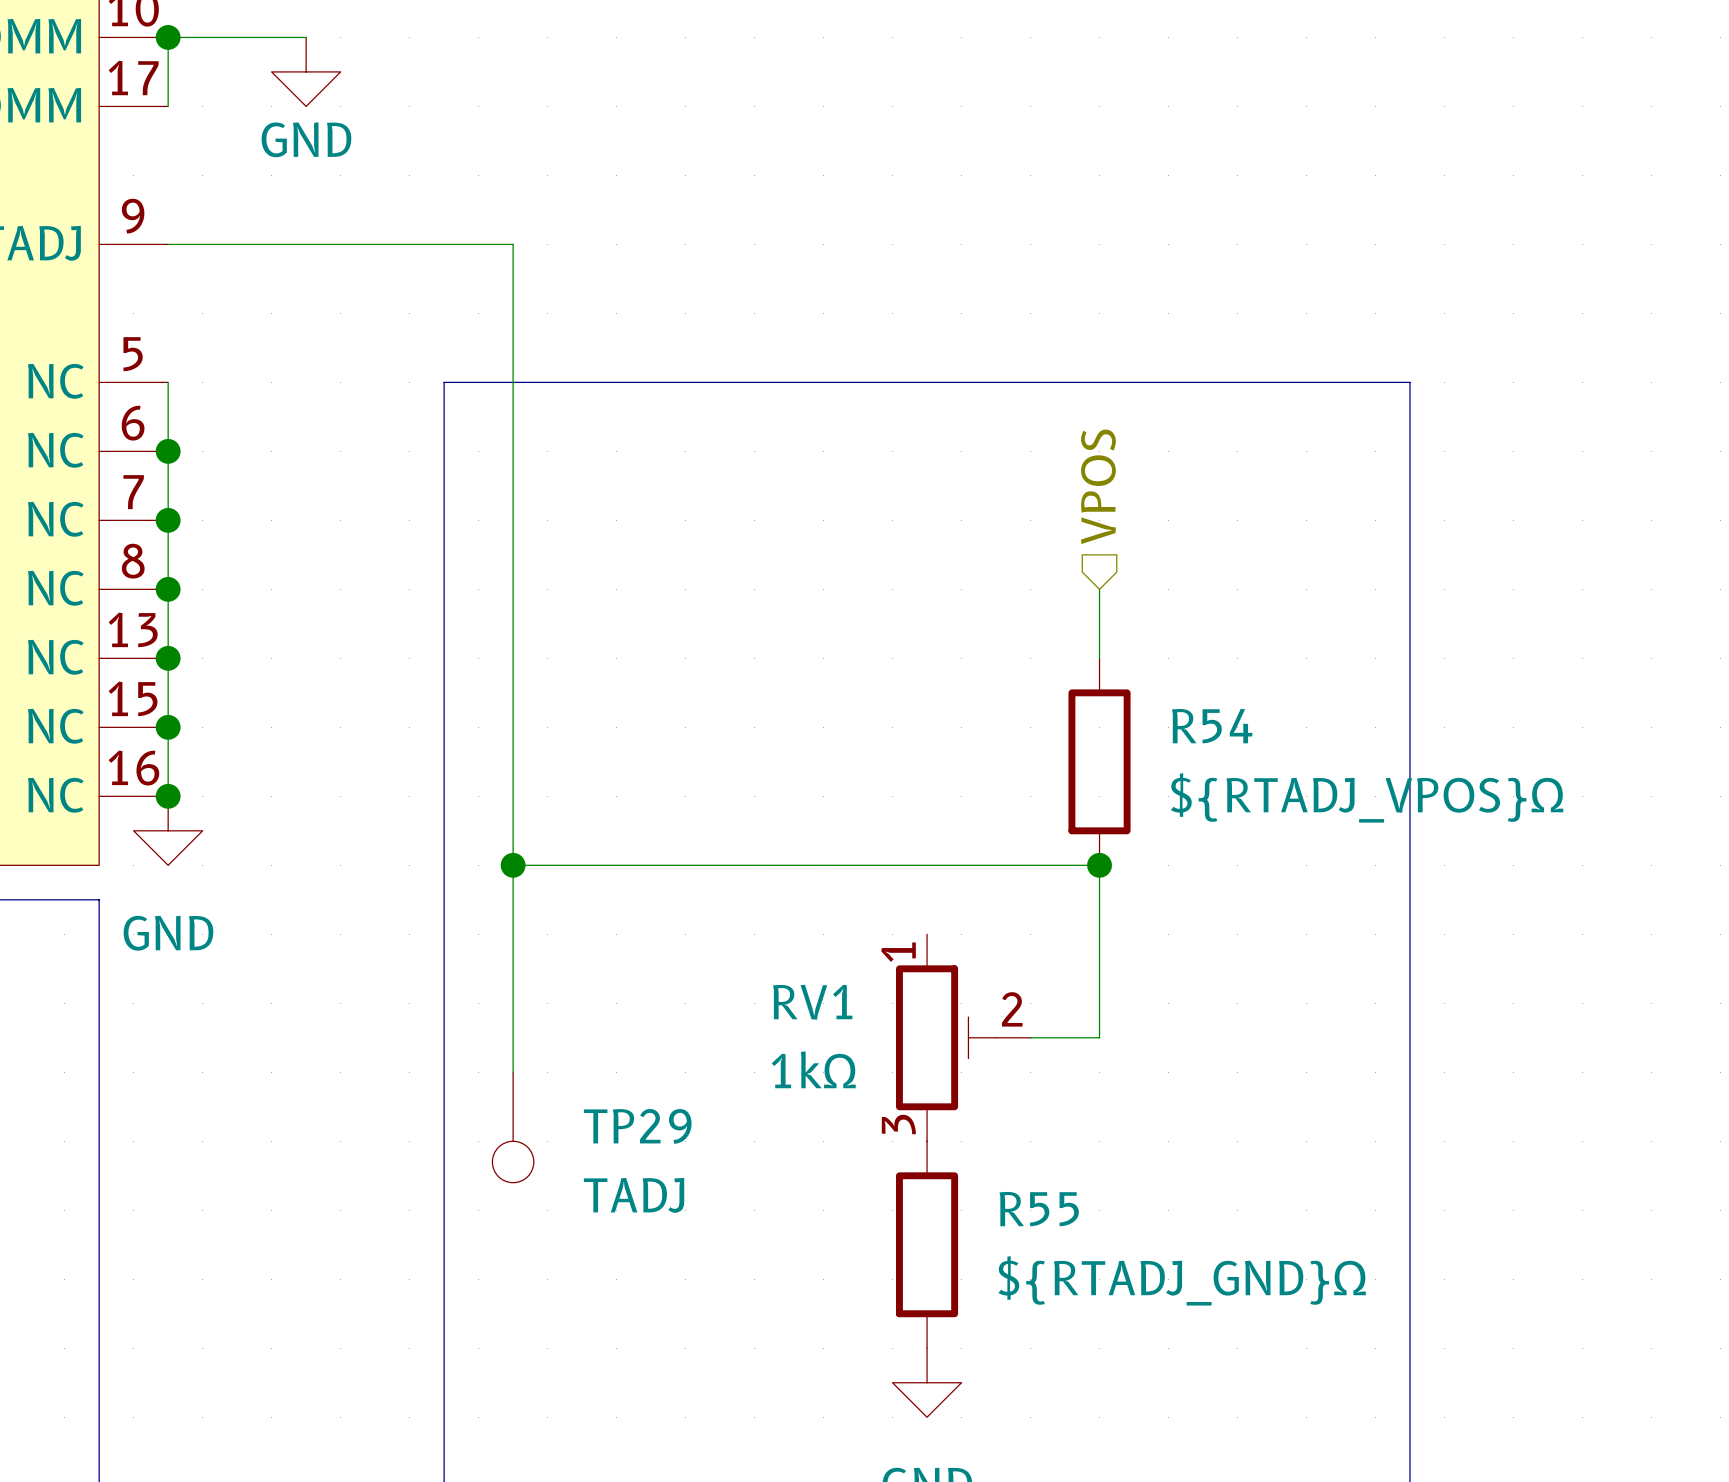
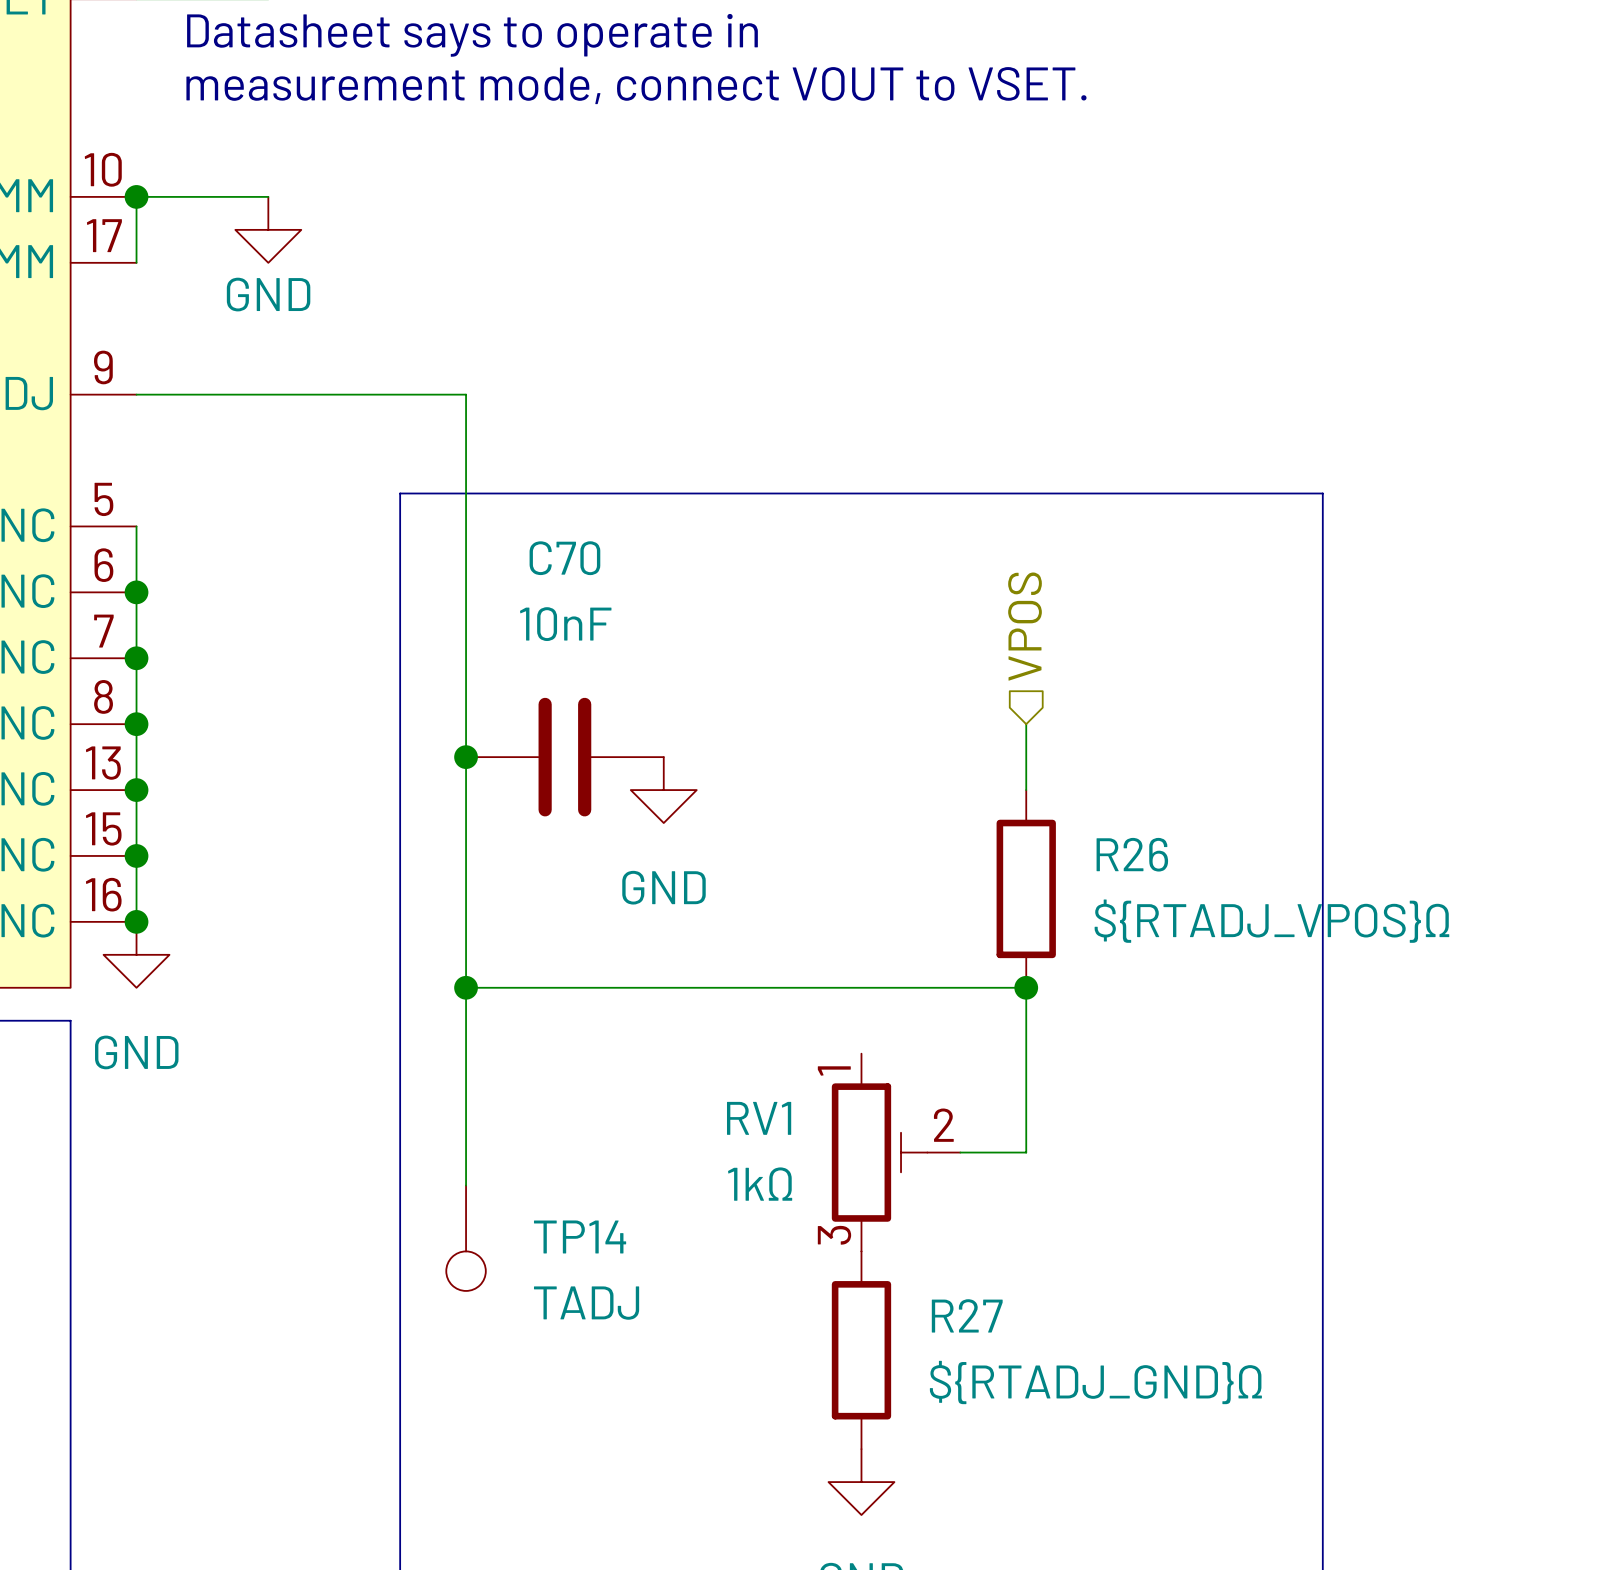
line: (444, 382) (1409, 382) -> (400, 526) (400, 493) (1322, 493) (1322, 526)
junction: none -> (466, 757)
C70: none -> 10nF (564, 757)
power symbol: none -> GND (663, 790)
R54 name: R54 (1212, 726) -> R26 (1132, 854)
TP29 name: TP29 (637, 1126) -> TP14 (580, 1236)
R55 name: R55 (1039, 1209) -> R27 (967, 1315)

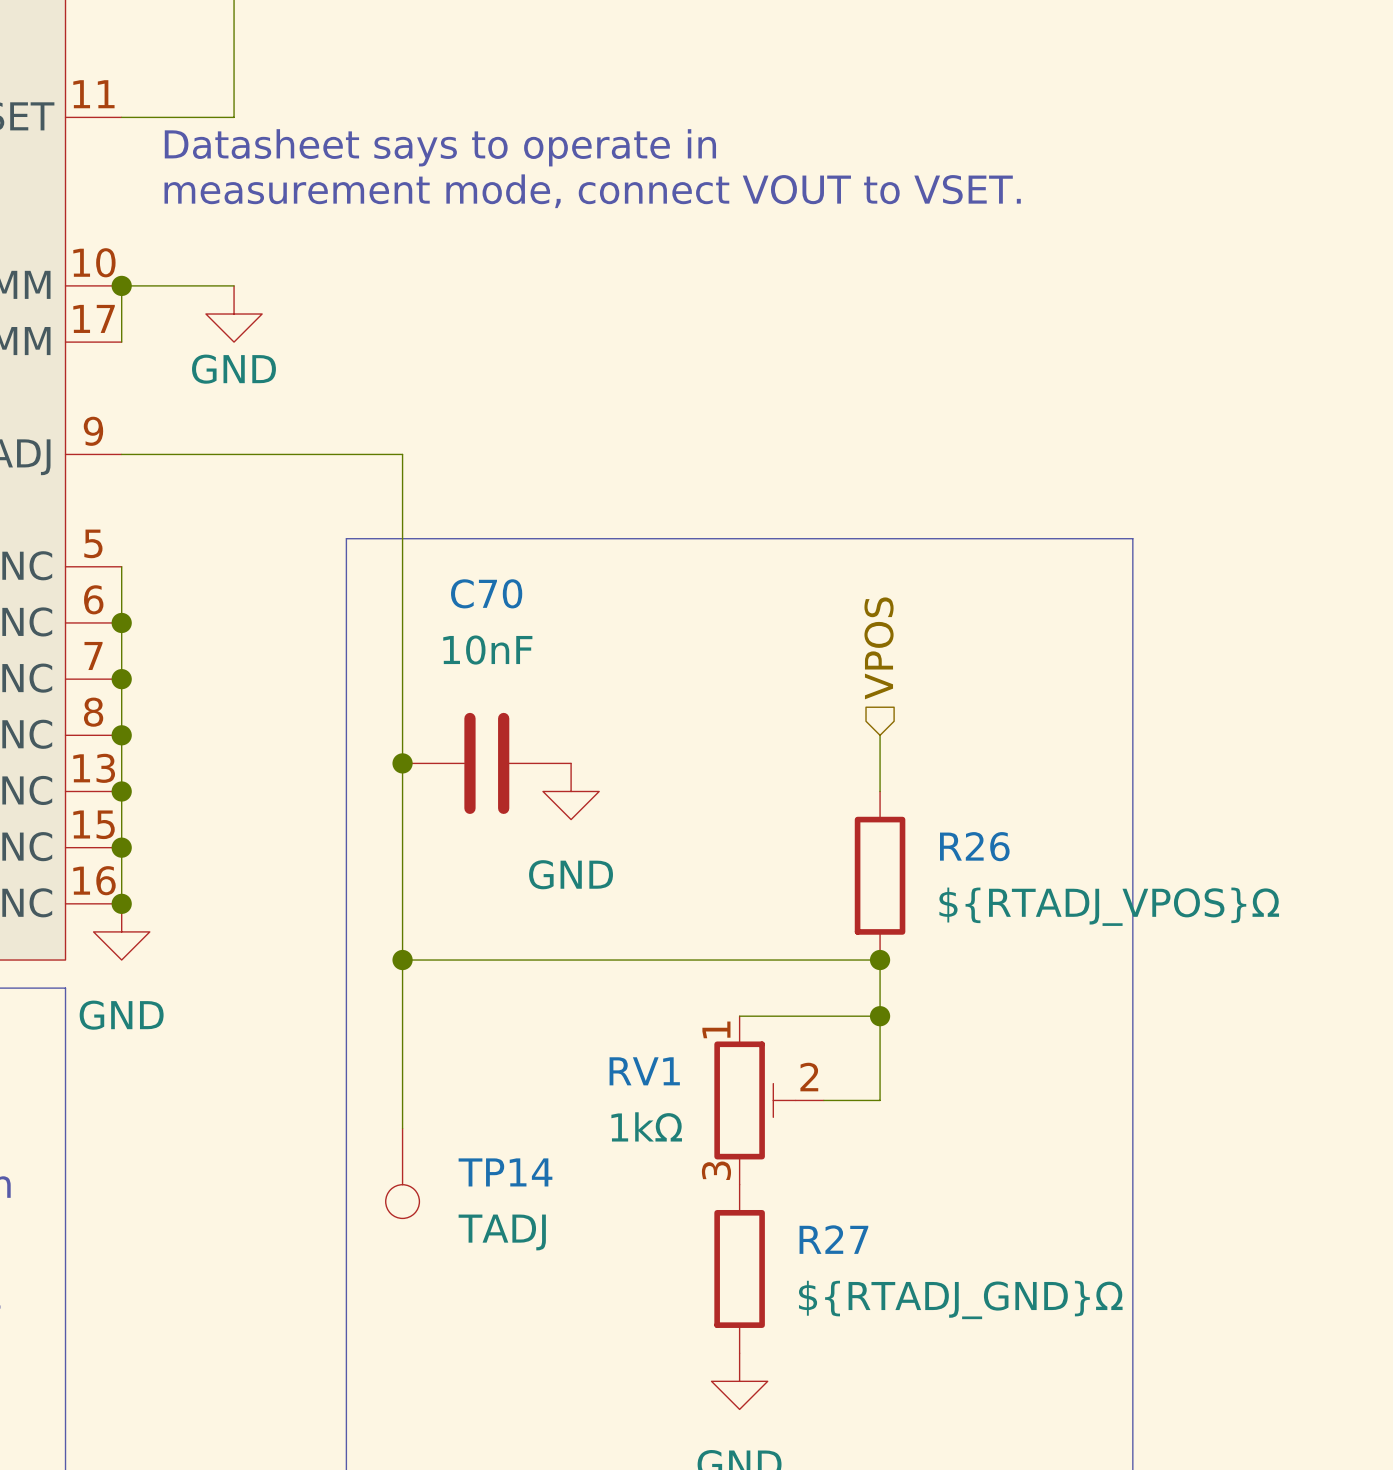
wire: none -> (739, 1016) (880, 1016)
junction: none -> (880, 1016)

